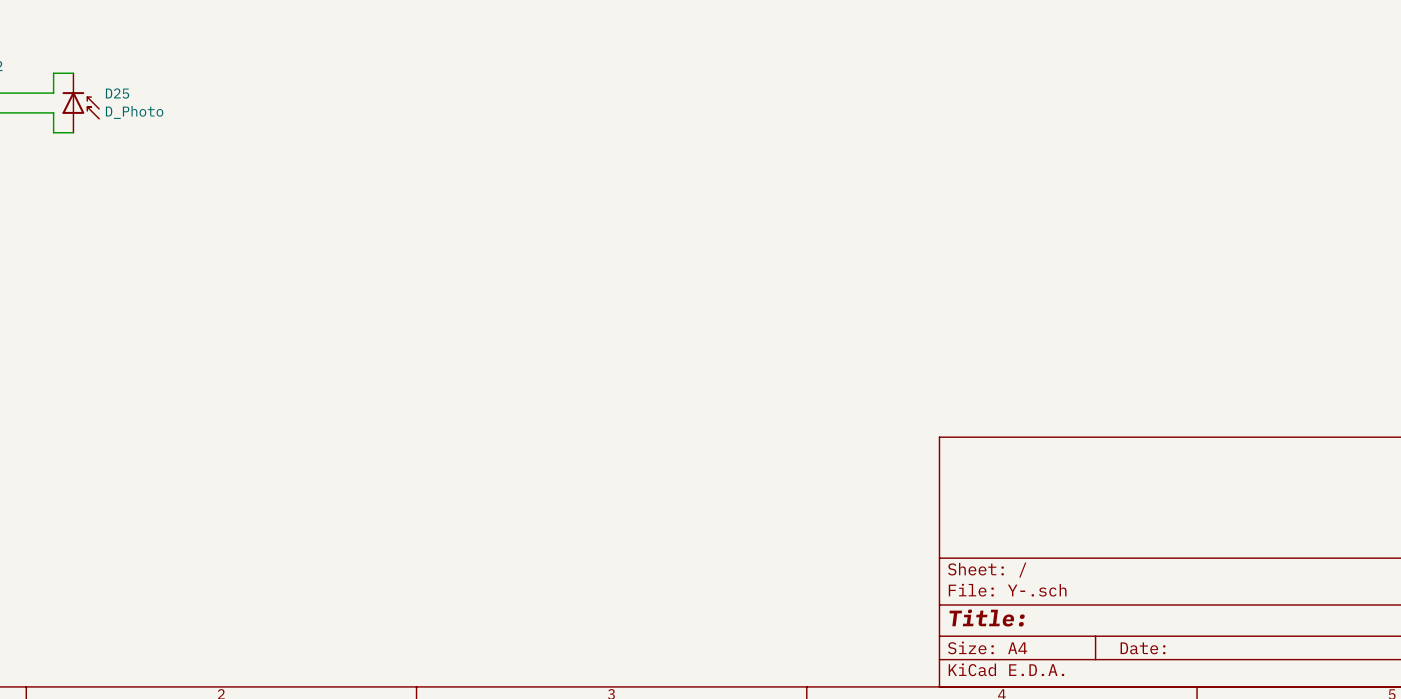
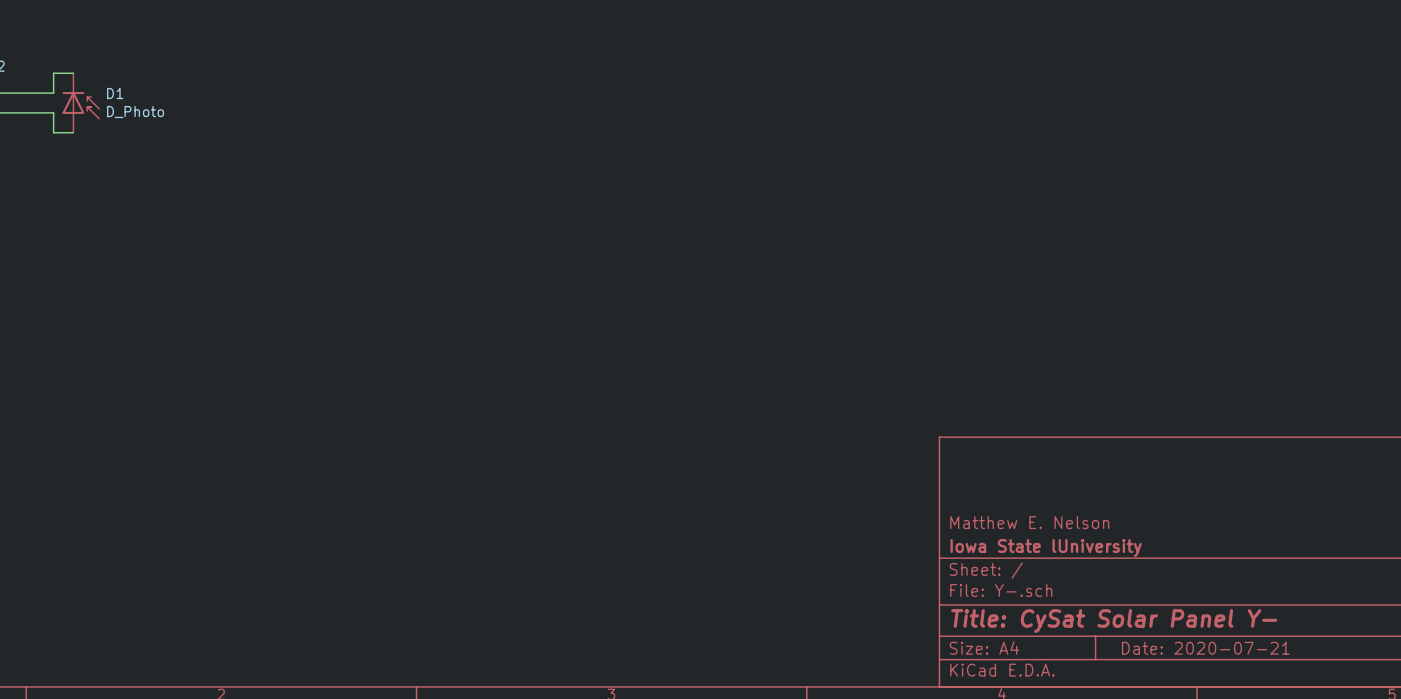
D25 name: D25 (117, 93) -> D1 (115, 93)
title block: none -> Matthew E. Nelson (1029, 522)
title block: none -> Iowa State lUniversity (1046, 547)
title block: Title: (987, 617) -> Title: CySat Solar Panel Y- (1114, 621)
title block: Date: (1143, 648) -> Date: 2020-07-21 (1205, 648)

